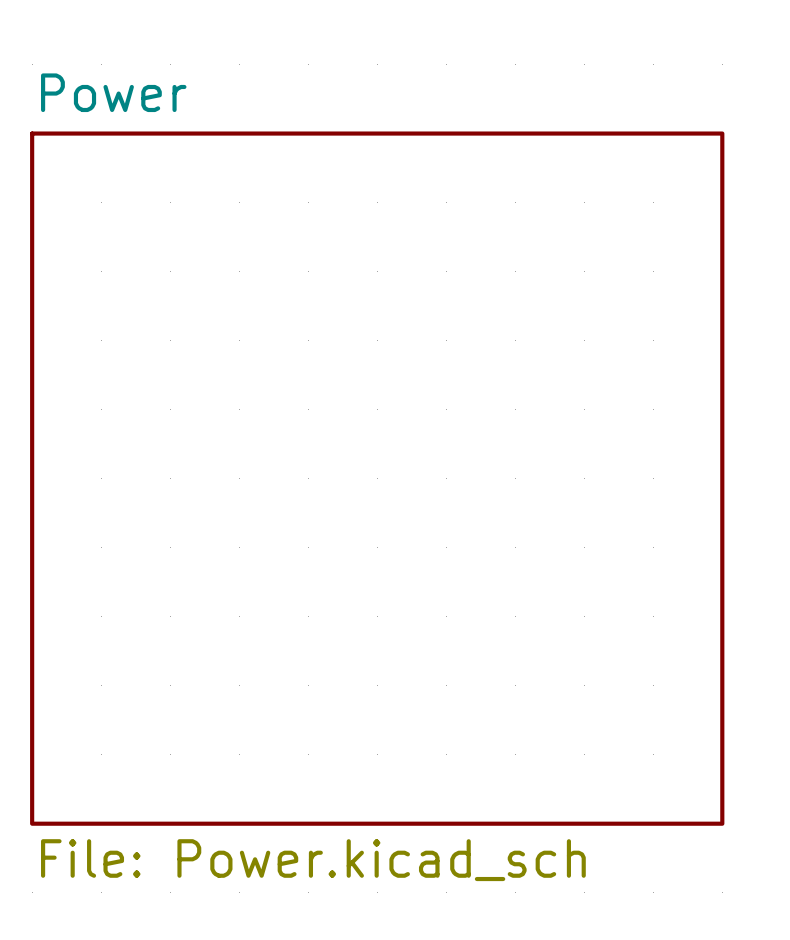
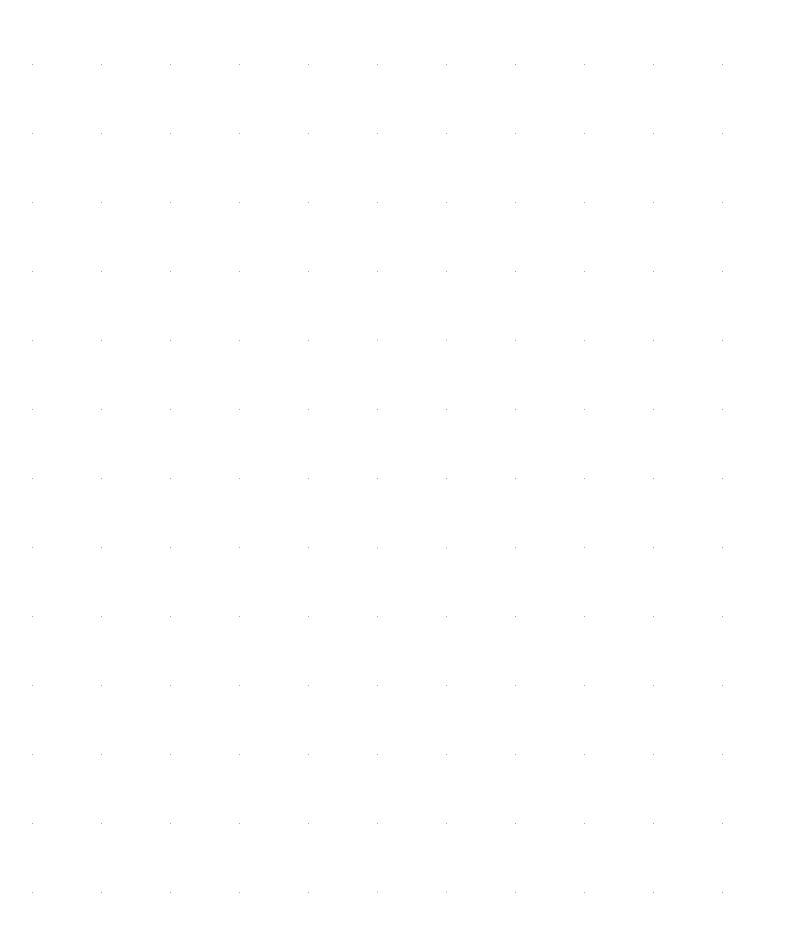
sheet Power: File: Power.kicad_sch (377, 478) -> none

